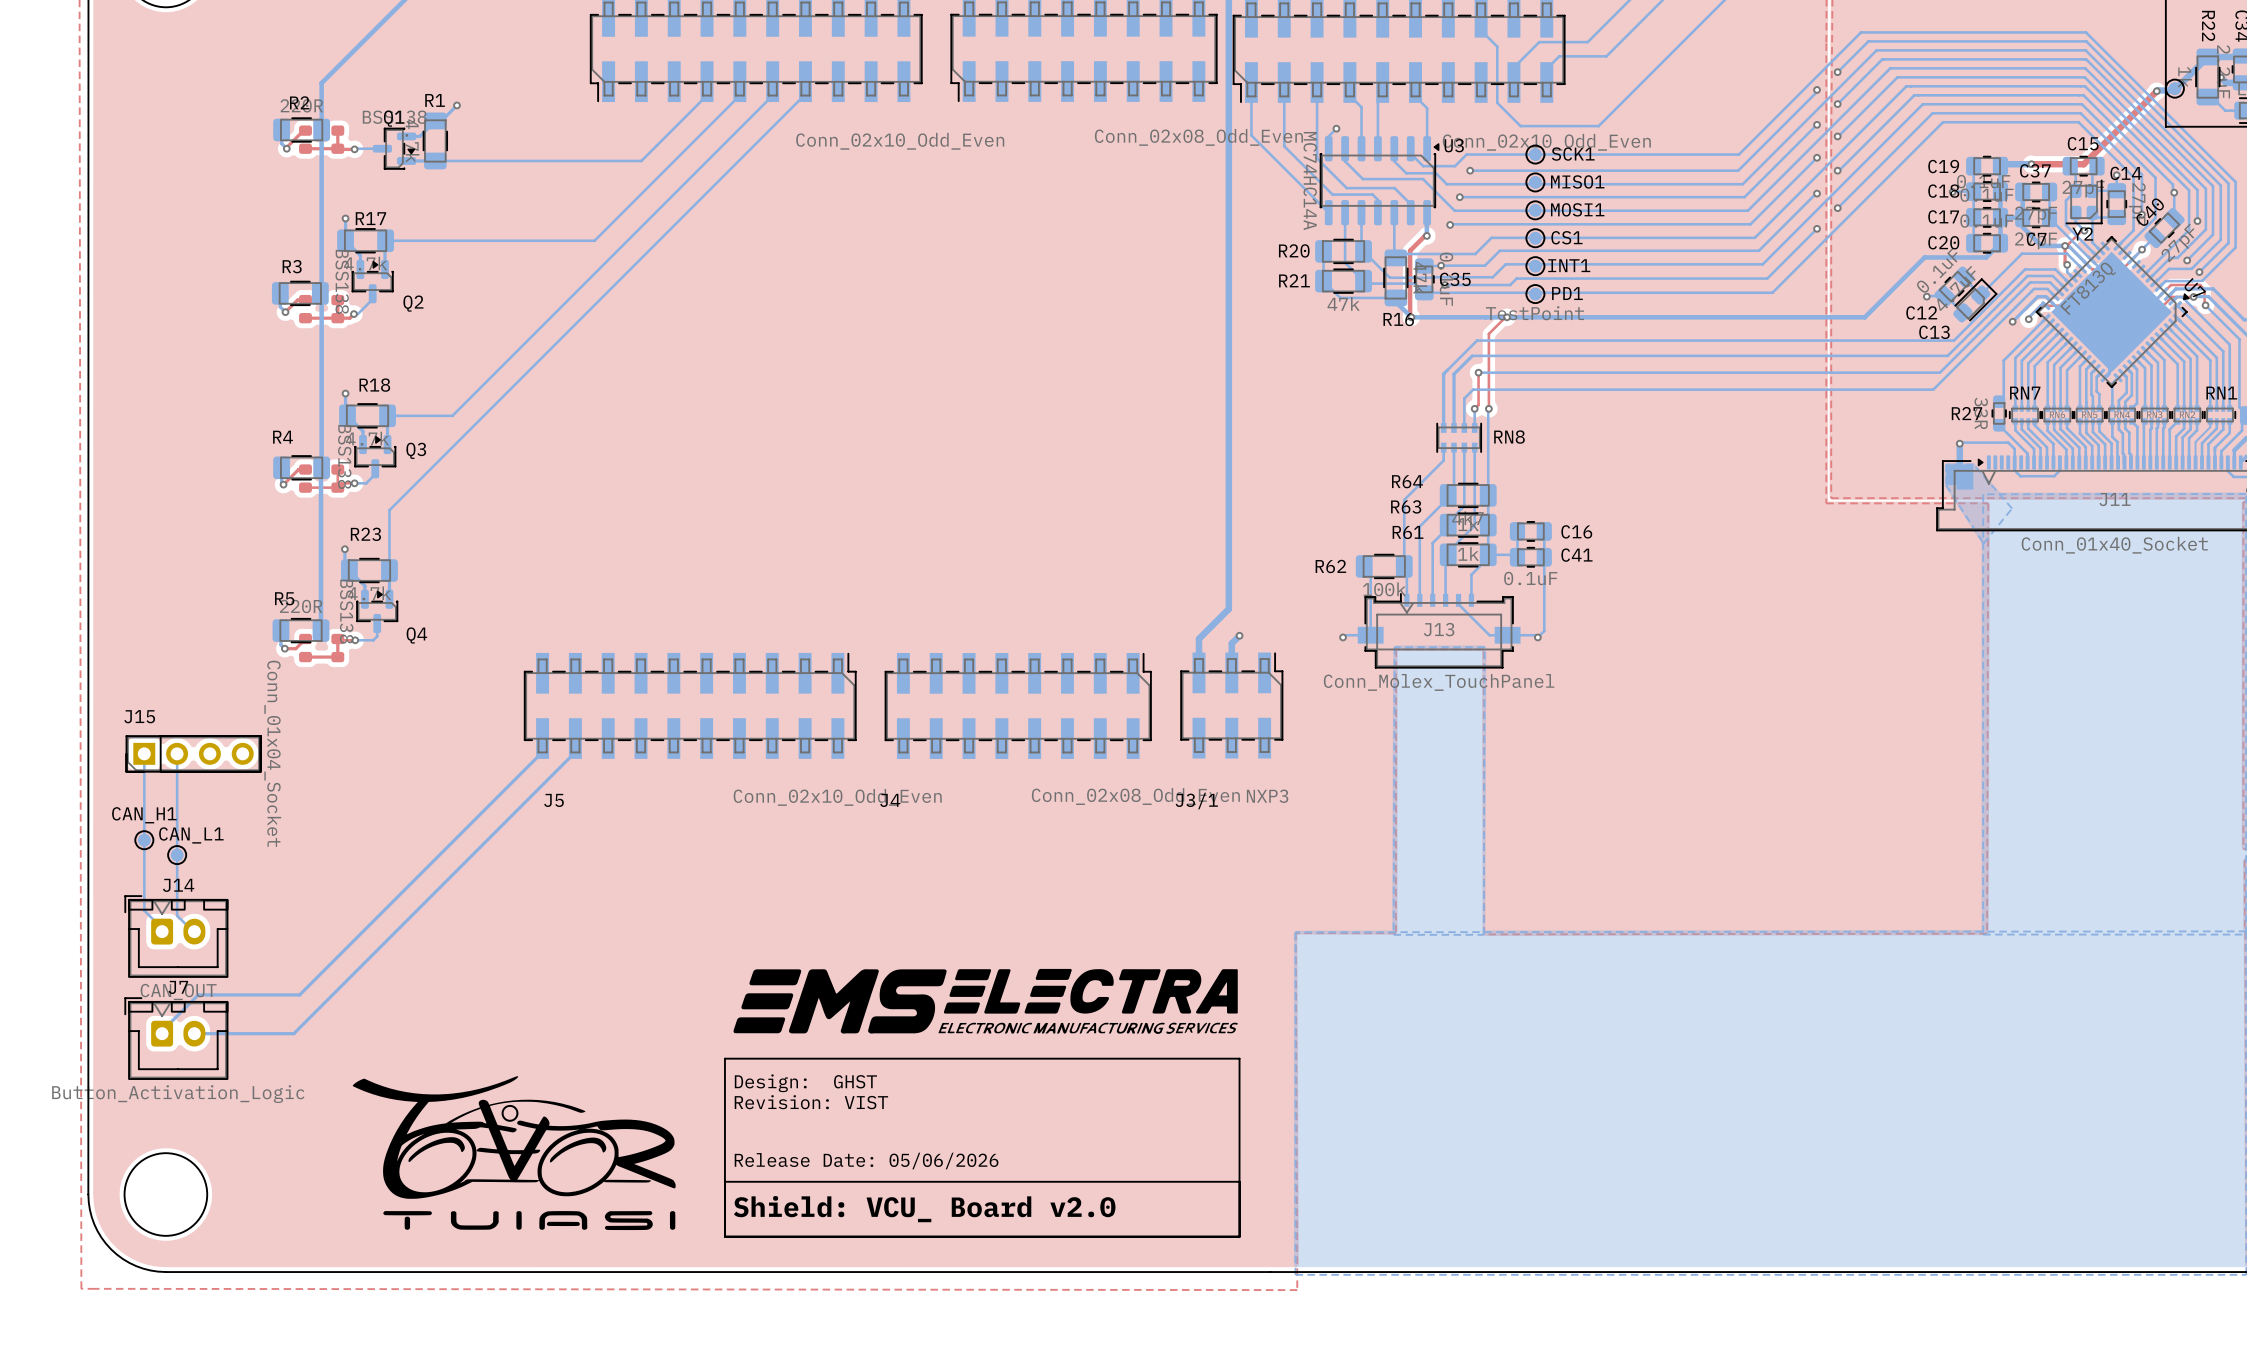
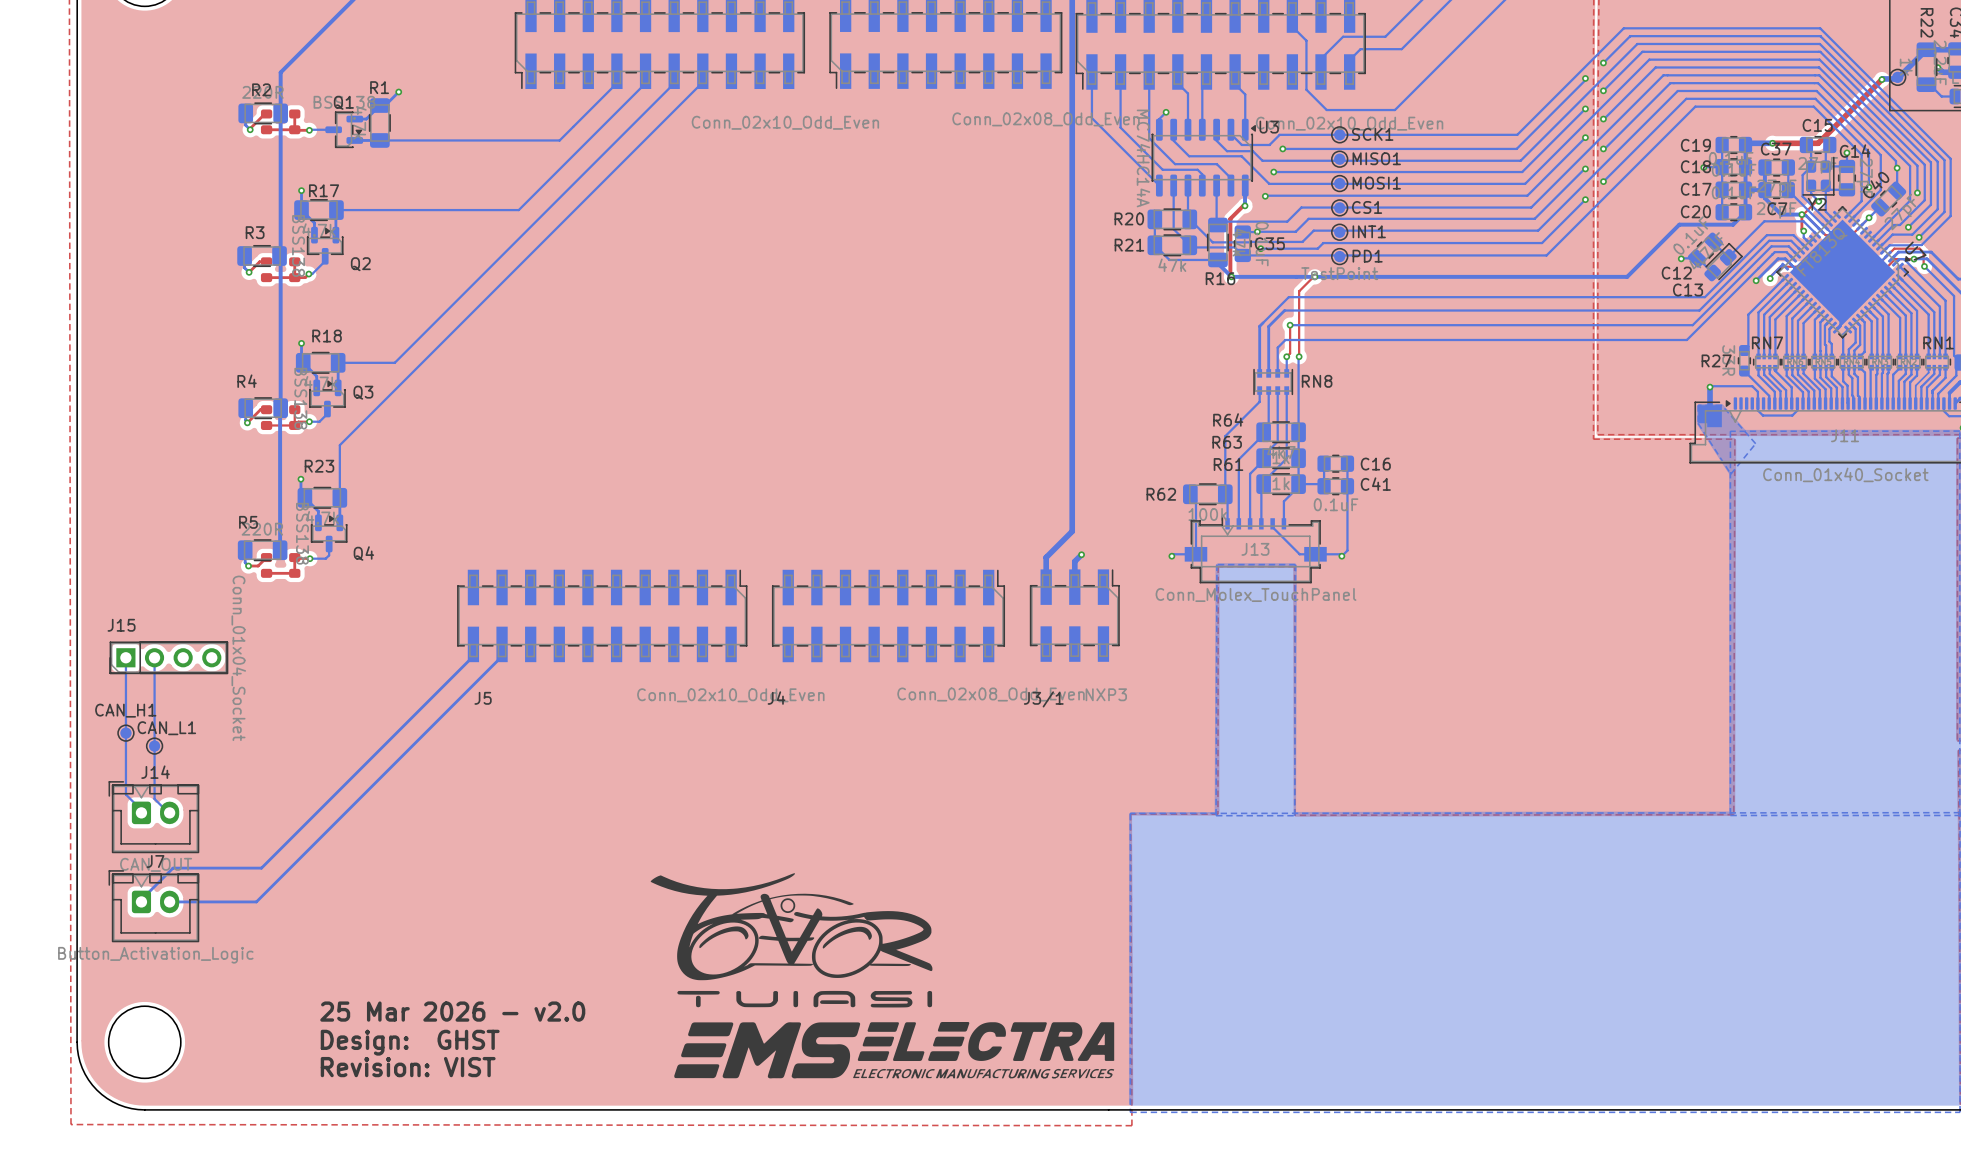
drawing position: (973, 974) -> (883, 1027)
drawing position: (1053, 974) -> (953, 1026)
drawing position: (775, 977) -> (710, 1029)
drawing position: (967, 991) -> (878, 1041)
drawing position: (1002, 991) -> (908, 1041)
drawing position: (1048, 991) -> (948, 1041)
drawing position: (1092, 991) -> (987, 1041)
drawing position: (1139, 991) -> (1028, 1041)
drawing position: (1176, 991) -> (1061, 1041)
drawing position: (1216, 991) -> (1096, 1041)
drawing: none -> [650, 873, 933, 1008]
drawing position: (767, 1001) -> (703, 1050)
drawing position: (833, 1001) -> (761, 1050)
drawing position: (907, 1001) -> (825, 1050)
drawing position: (961, 1008) -> (873, 1056)
drawing position: (1042, 1008) -> (943, 1056)
drawing: [965, 1022, 977, 1034] -> none
drawing: [1098, 1022, 1109, 1034] -> none
drawing position: (759, 1025) -> (696, 1071)
drawing position: (1171, 1027) -> (1056, 1073)
drawing position: (1232, 1027) -> (1109, 1073)
drawing position: (943, 1028) -> (857, 1073)
drawing position: (950, 1028) -> (863, 1073)
drawing position: (961, 1028) -> (872, 1073)
drawing position: (981, 1028) -> (890, 1073)
drawing position: (988, 1028) -> (896, 1073)
drawing position: (999, 1028) -> (906, 1073)
drawing position: (1011, 1028) -> (916, 1073)
drawing position: (1019, 1028) -> (923, 1073)
drawing position: (1026, 1028) -> (930, 1073)
drawing position: (1040, 1028) -> (942, 1073)
drawing position: (1050, 1028) -> (950, 1073)
drawing position: (1063, 1028) -> (962, 1073)
drawing position: (1075, 1028) -> (972, 1073)
drawing position: (1084, 1028) -> (980, 1073)
drawing position: (1091, 1028) -> (986, 1073)
drawing position: (1113, 1028) -> (1005, 1073)
drawing position: (1122, 1028) -> (1013, 1073)
drawing position: (1132, 1028) -> (1022, 1073)
drawing position: (1139, 1028) -> (1028, 1073)
drawing position: (1147, 1028) -> (1035, 1073)
drawing position: (1159, 1028) -> (1045, 1073)
drawing position: (1180, 1028) -> (1064, 1073)
drawing position: (1189, 1028) -> (1072, 1073)
drawing position: (1202, 1028) -> (1083, 1073)
drawing position: (1207, 1028) -> (1087, 1073)
drawing position: (1215, 1028) -> (1094, 1073)
drawing position: (1223, 1028) -> (1101, 1073)
drawing: [1155, 1032, 1171, 1034] -> none
drawing: [352, 1076, 676, 1231] -> none
text: Design: GHST (805, 1083) -> none
text: Revision: VIST (811, 1102) -> none
text: none -> 25 Mar 2026 - v2.0 (452, 1011)
text: Release Date: 05/06/2026 (866, 1161) -> none
line: (724, 1181) (1239, 1181) (1239, 1236) (724, 1236) (724, 1058) (1239, 1058) (1239, 1236) -> none
text: none -> Design: GHST (410, 1042)
text: Shield: VCU_ Board v2.0 (924, 1209) -> none
text: none -> Revision: VIST (408, 1067)
drawing: none -> [877, 1068, 886, 1079]
drawing: none -> [992, 1068, 1002, 1079]

